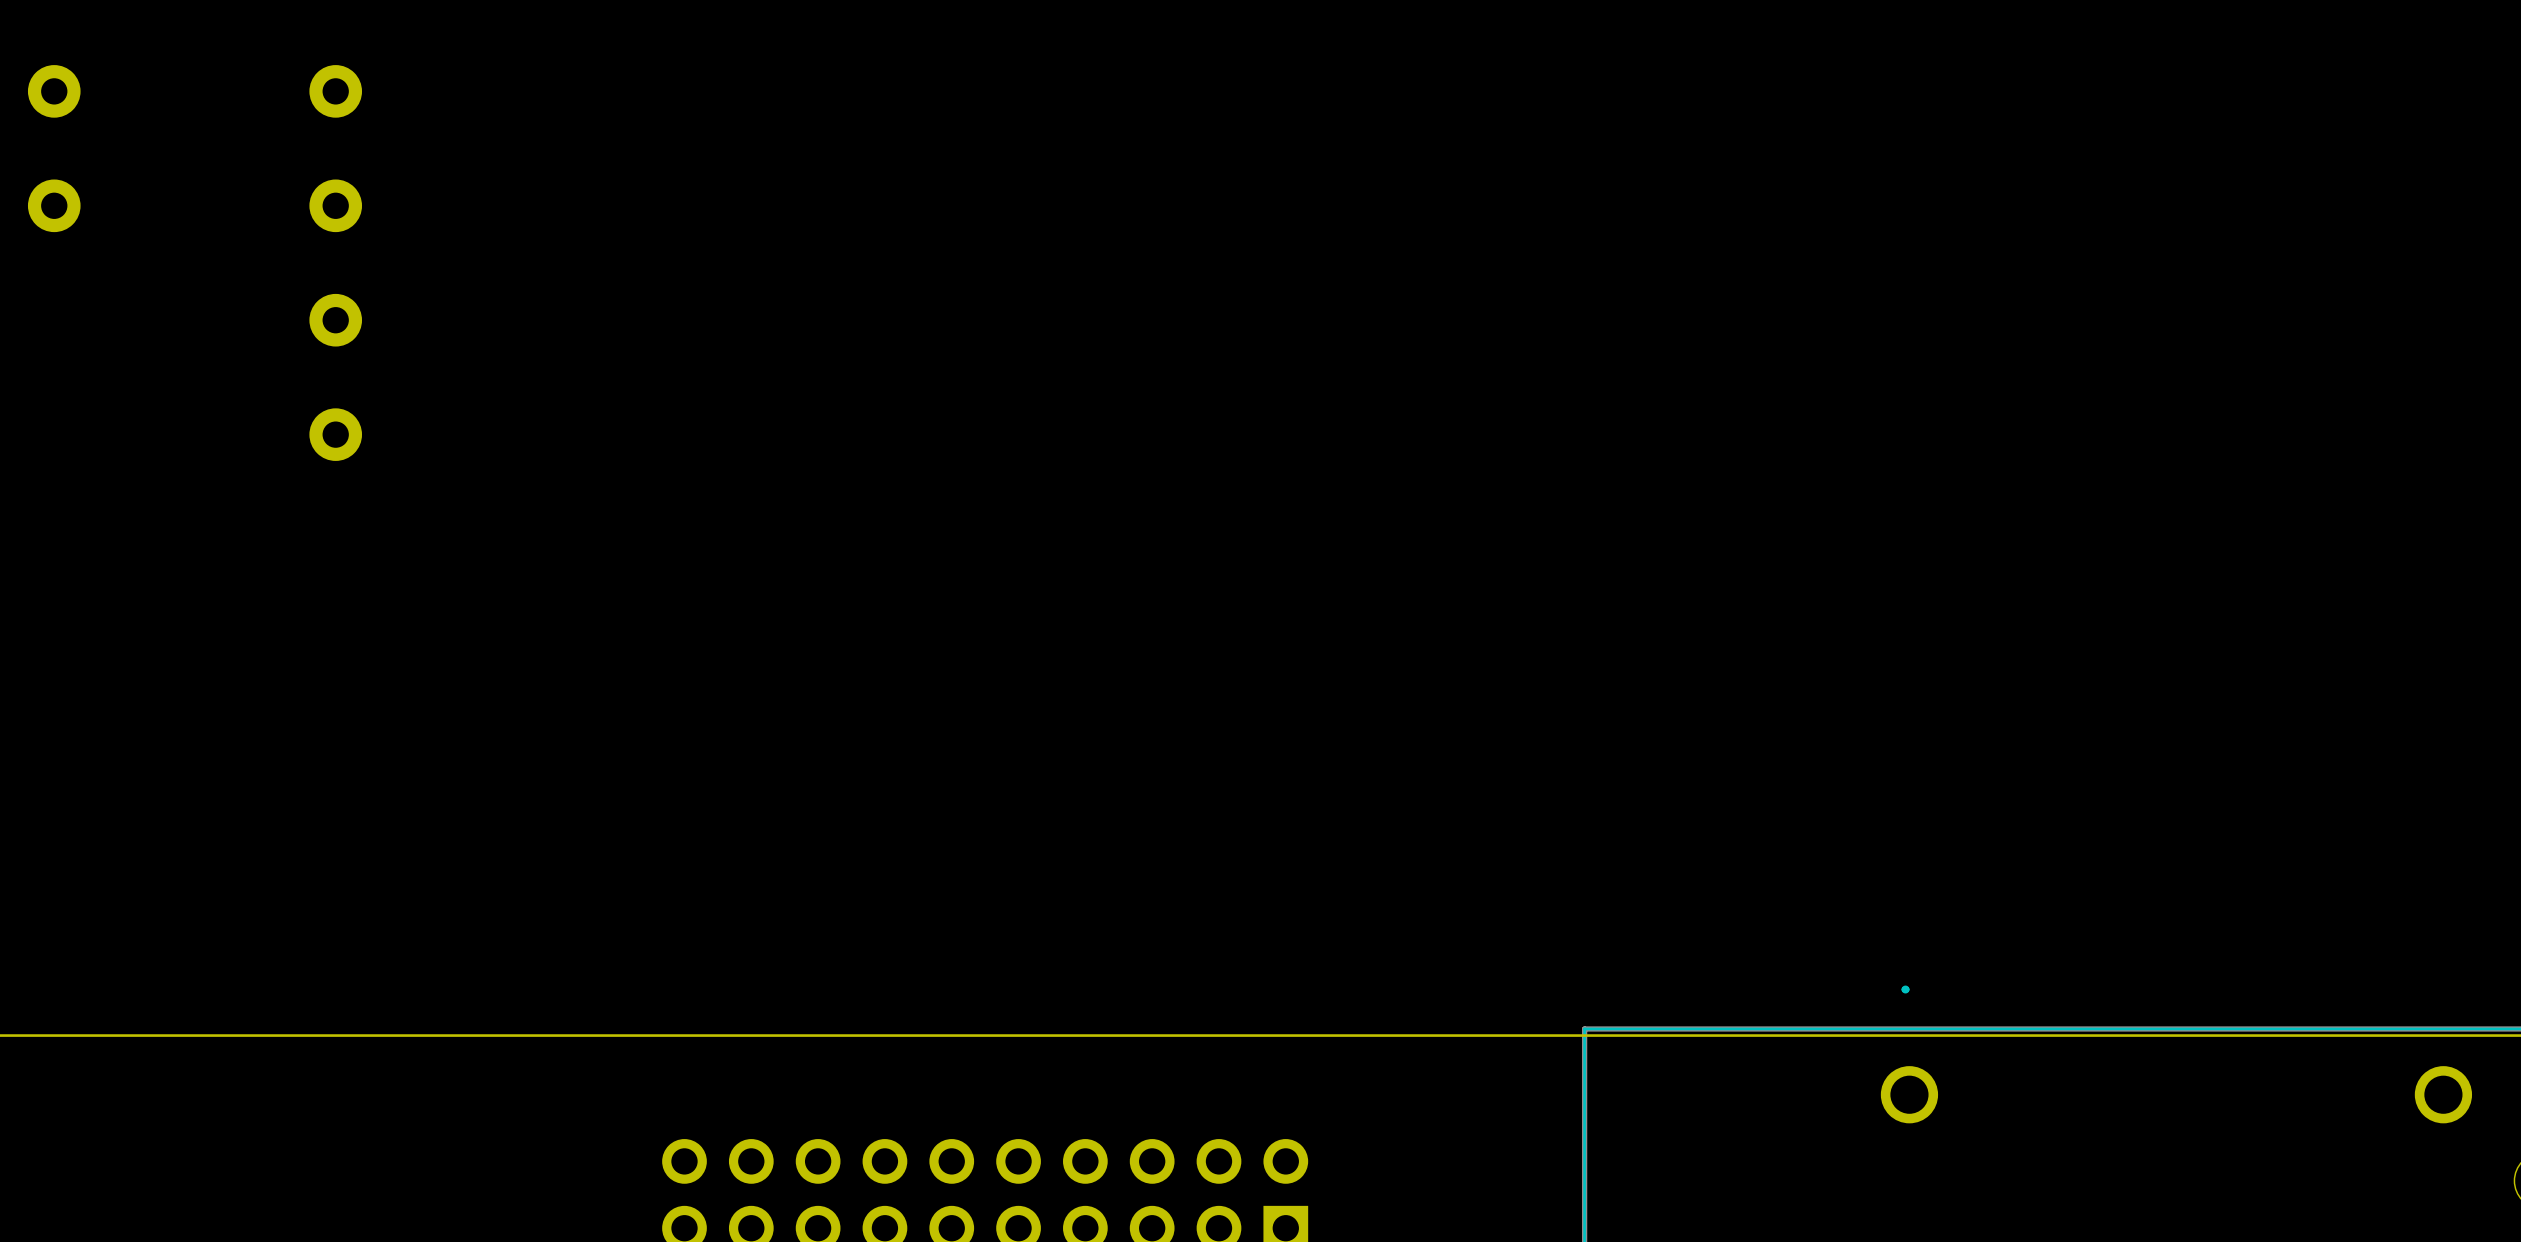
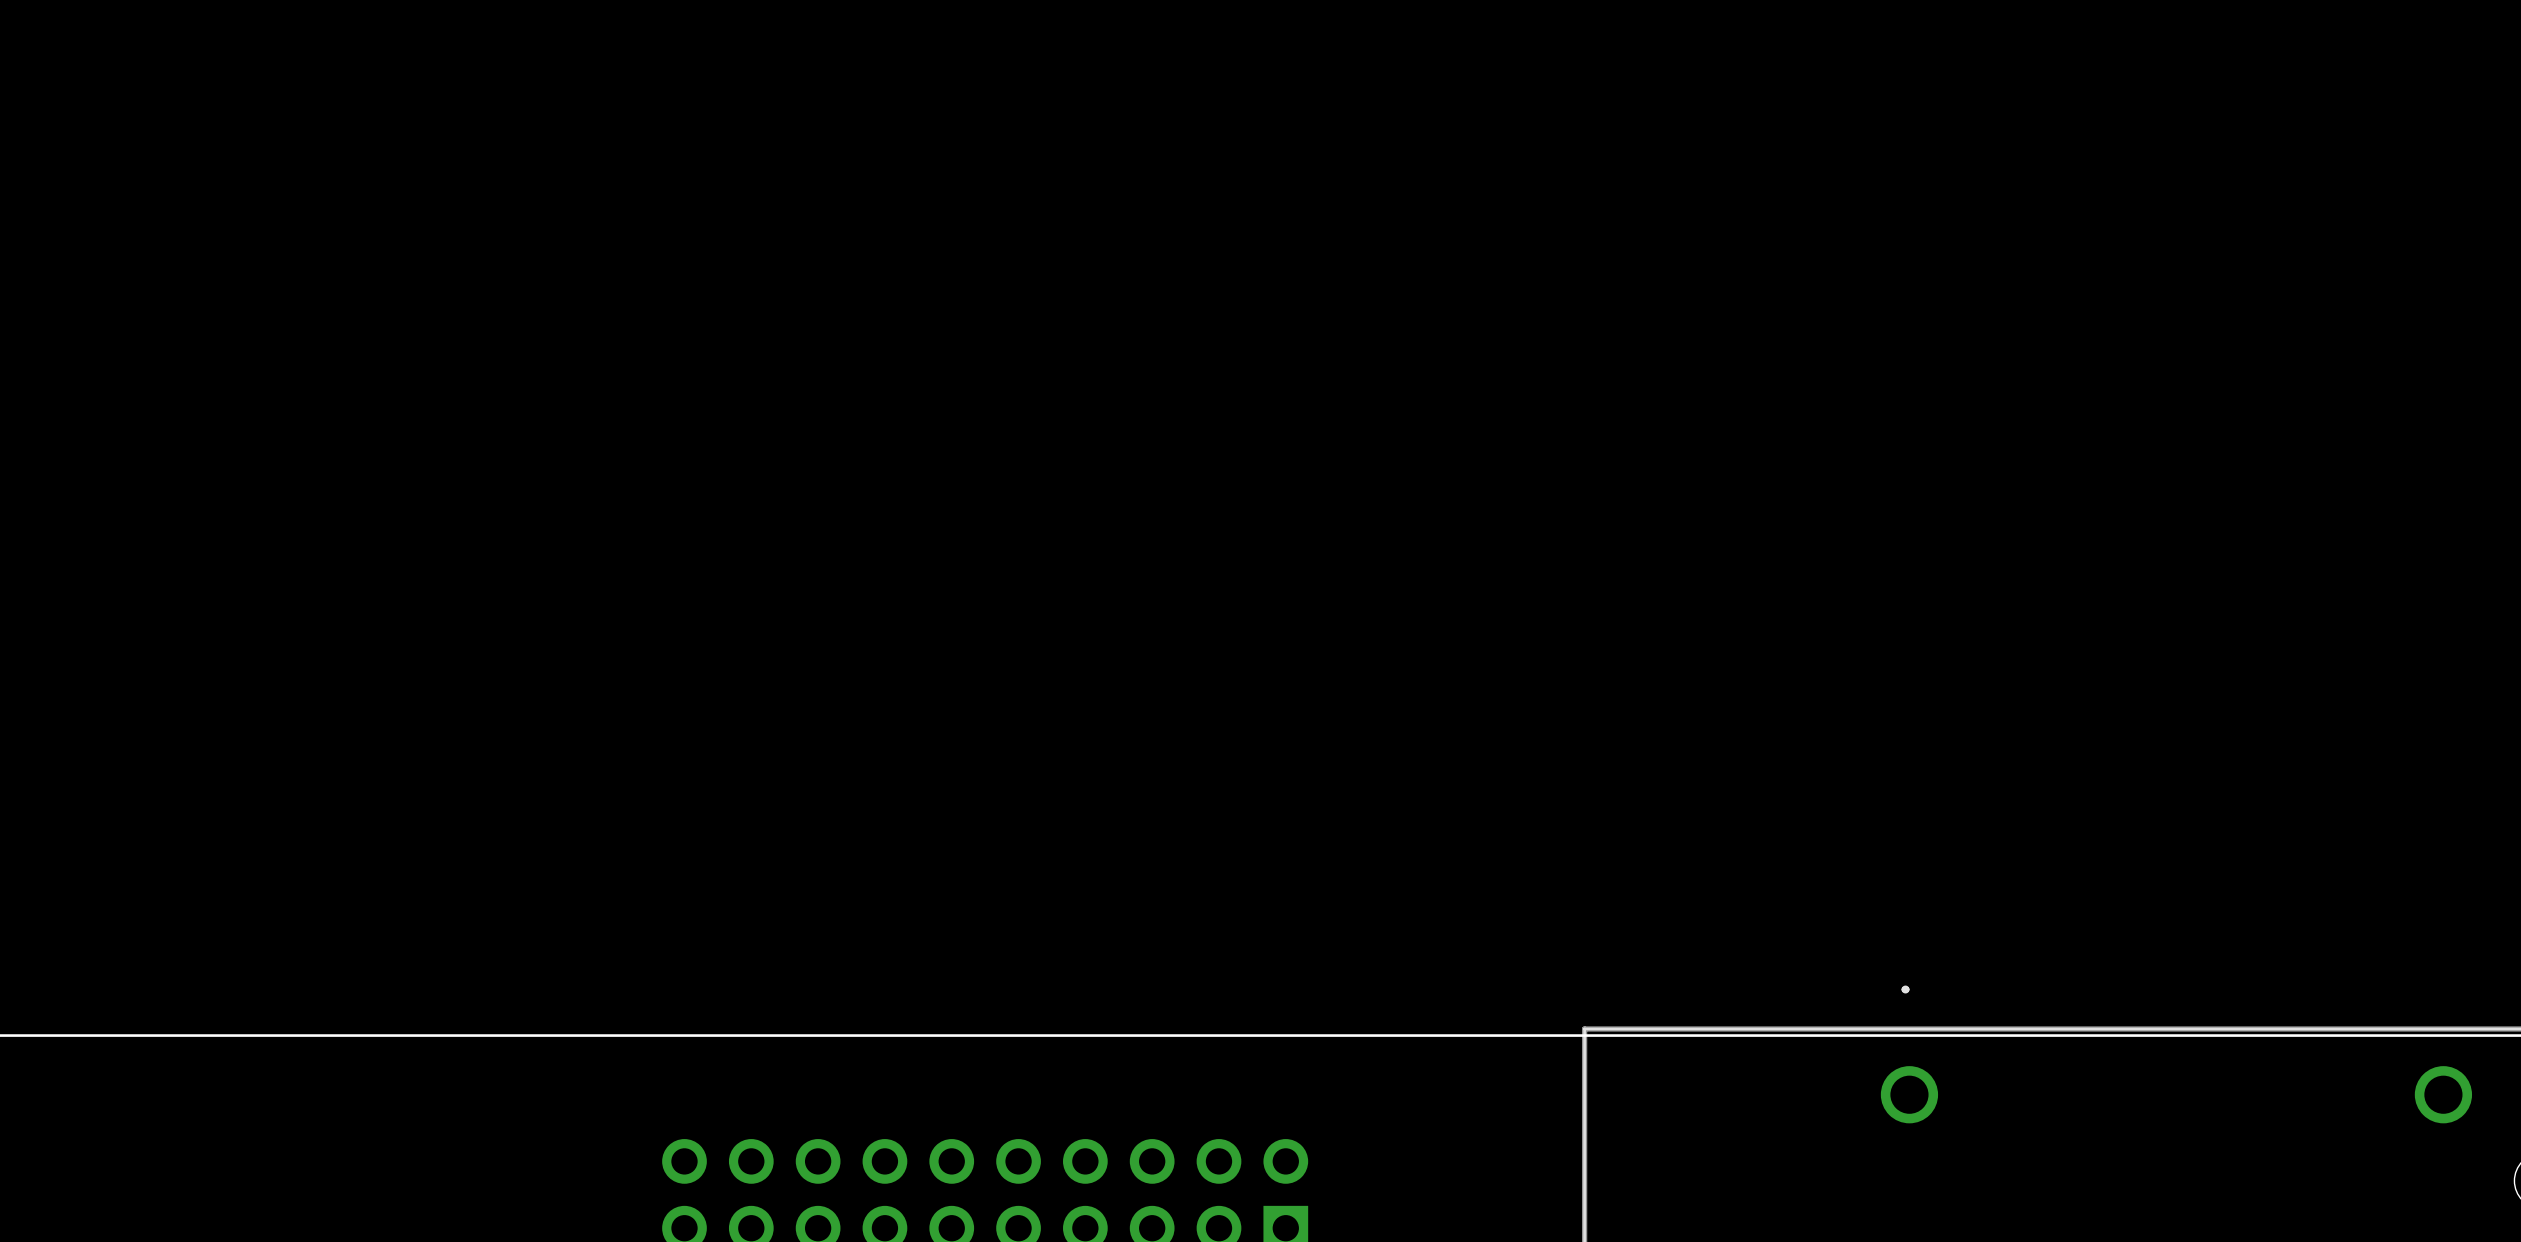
part: (54, 91) -> none
part: (335, 91) -> none
part: (54, 205) -> none
part: (335, 205) -> none
part: (335, 320) -> none
part: (335, 434) -> none

